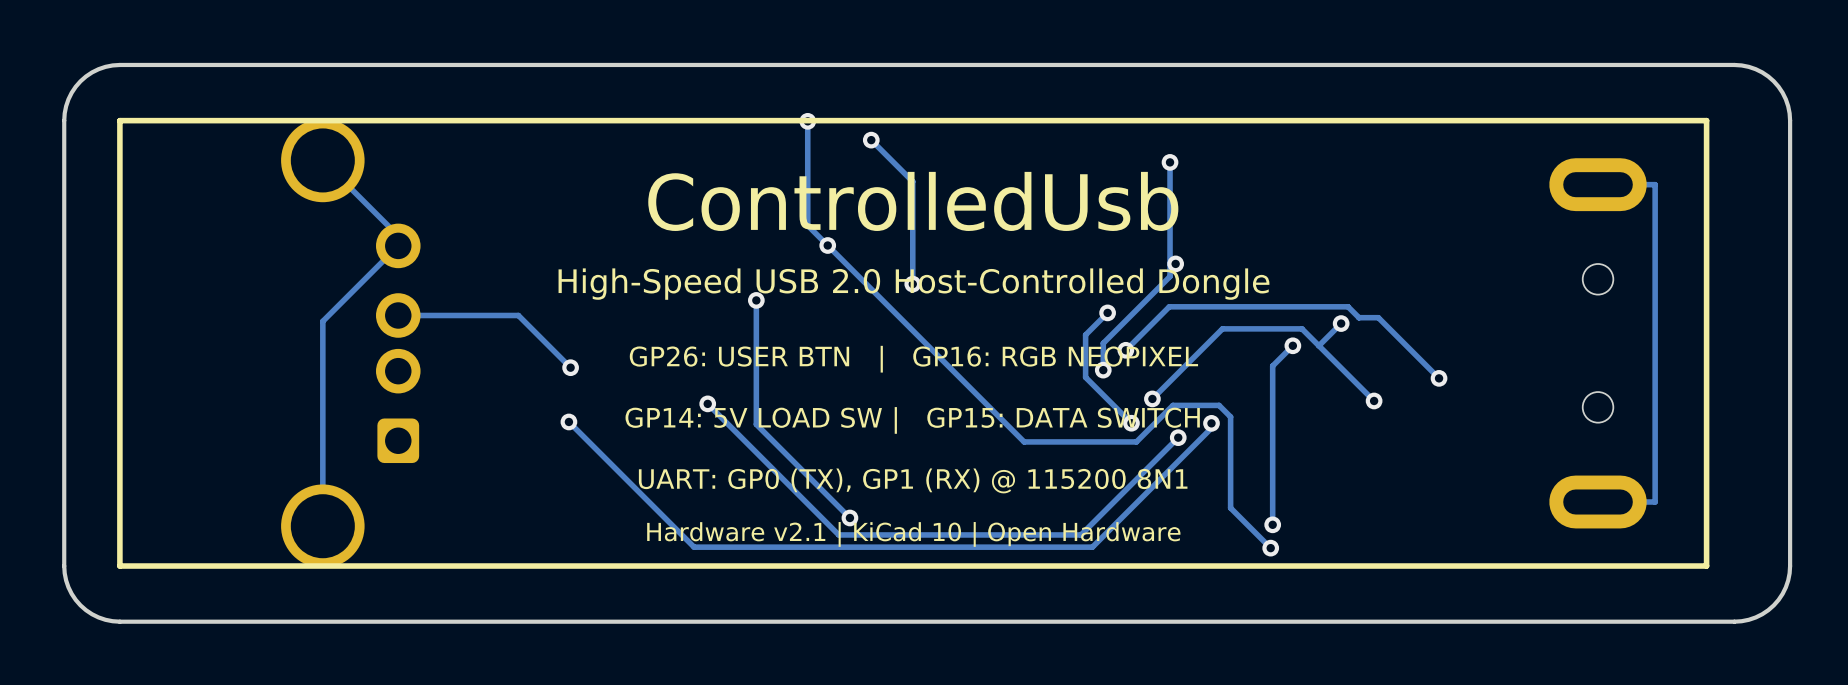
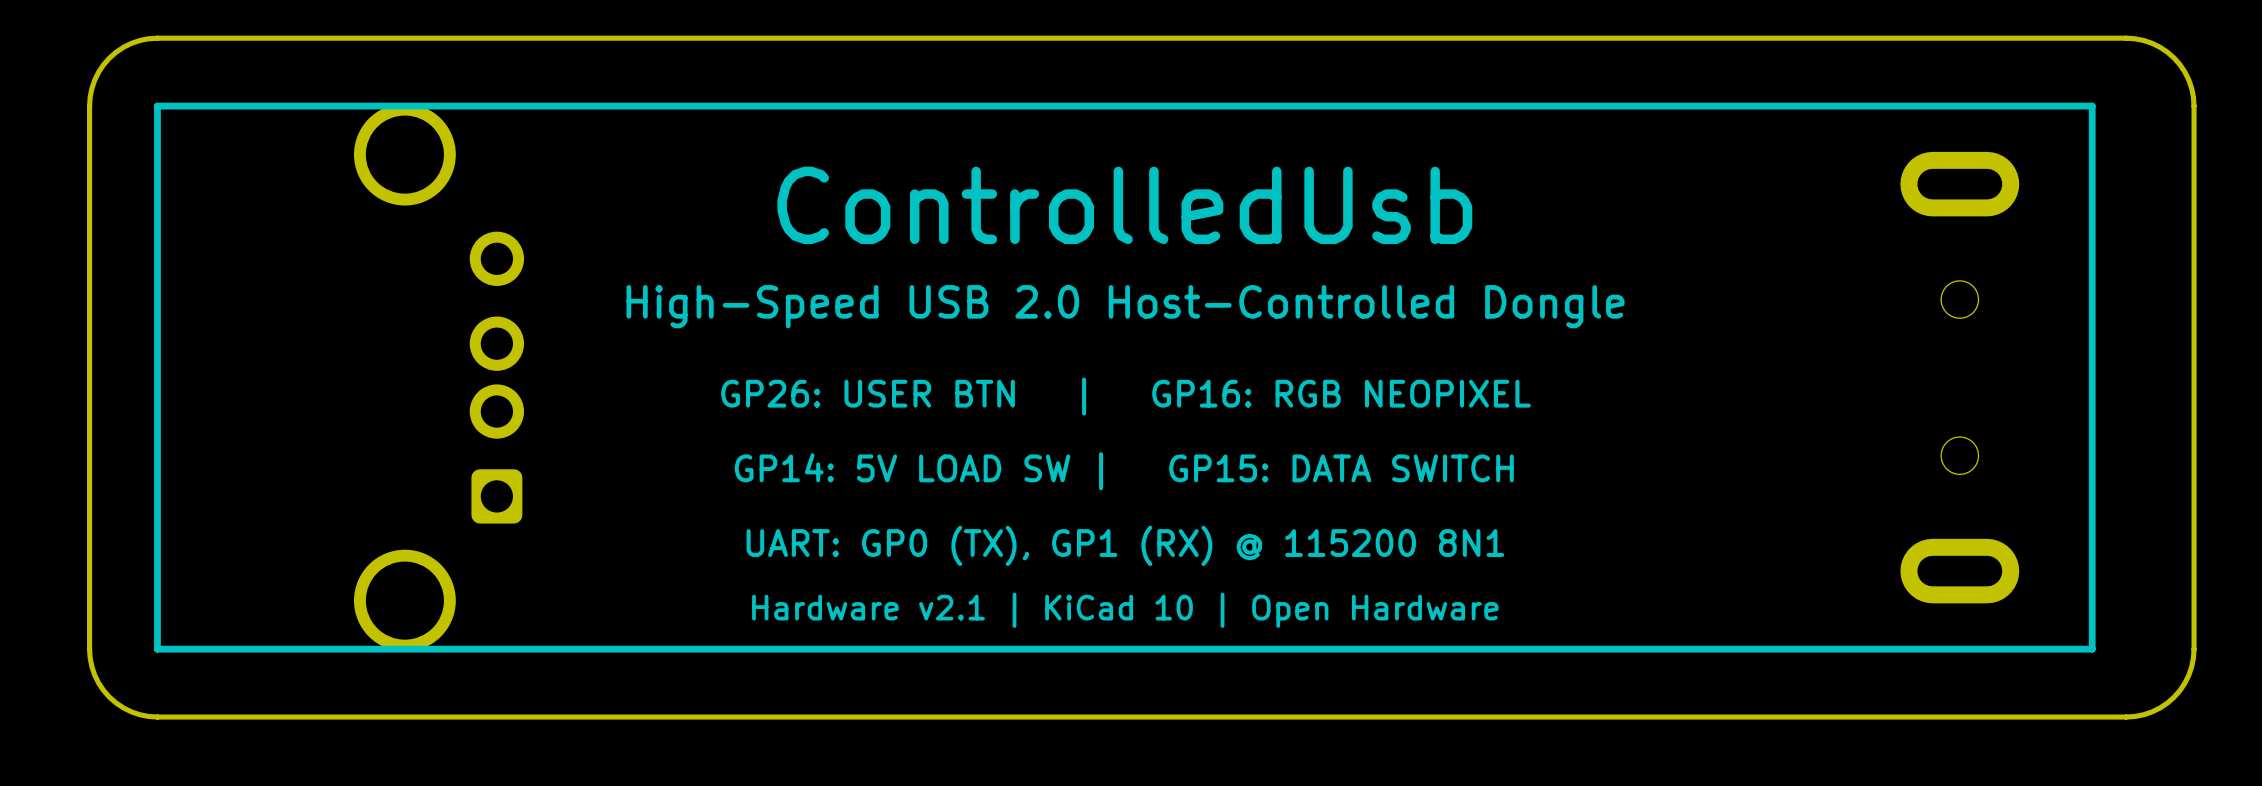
track: (807, 121) (807, 225) (1024, 441) (1136, 441) (1172, 405) (1219, 405) (1230, 416) (1230, 508) (1270, 548) -> none
via: (807, 121) -> none
track: (871, 140) (912, 181) (912, 284) -> none
via: (871, 140) -> none
track: (322, 160) (398, 235) (398, 245) (322, 321) (322, 526) -> none
track: (1170, 162) (1170, 276) (1103, 343) (1103, 370) -> none
via: (1170, 162) -> none
track: (1598, 184) (1655, 184) (1655, 502) (1598, 502) -> none
via: (827, 245) -> none
via: (1175, 263) -> none
via: (912, 284) -> none
track: (756, 300) (756, 424) (849, 517) -> none
via: (756, 300) -> none
track: (1107, 312) (1085, 334) (1085, 377) (1131, 423) -> none
via: (1107, 312) -> none
track: (398, 315) (518, 315) (570, 367) -> none
track: (1341, 323) (1318, 345) -> none
via: (1341, 323) -> none
track: (1292, 345) (1272, 365) (1272, 524) -> none
via: (1292, 345) -> none
track: (1125, 350) (1169, 306) (1348, 306) (1358, 317) (1378, 317) (1439, 378) -> none
via: (1125, 350) -> none
via: (570, 367) -> none
via: (1103, 370) -> none
via: (1439, 378) -> none
track: (1152, 398) (1222, 328) (1302, 328) (1374, 400) -> none
via: (1152, 398) -> none
via: (1374, 400) -> none
track: (707, 403) (838, 534) (1080, 534) (1178, 437) -> none
via: (707, 403) -> none
track: (568, 421) (694, 547) (1092, 547) (1211, 428) (1211, 423) -> none
via: (568, 421) -> none
via: (1131, 423) -> none
via: (1211, 423) -> none
via: (1178, 437) -> none
via: (849, 517) -> none
via: (1272, 524) -> none
via: (1270, 548) -> none

